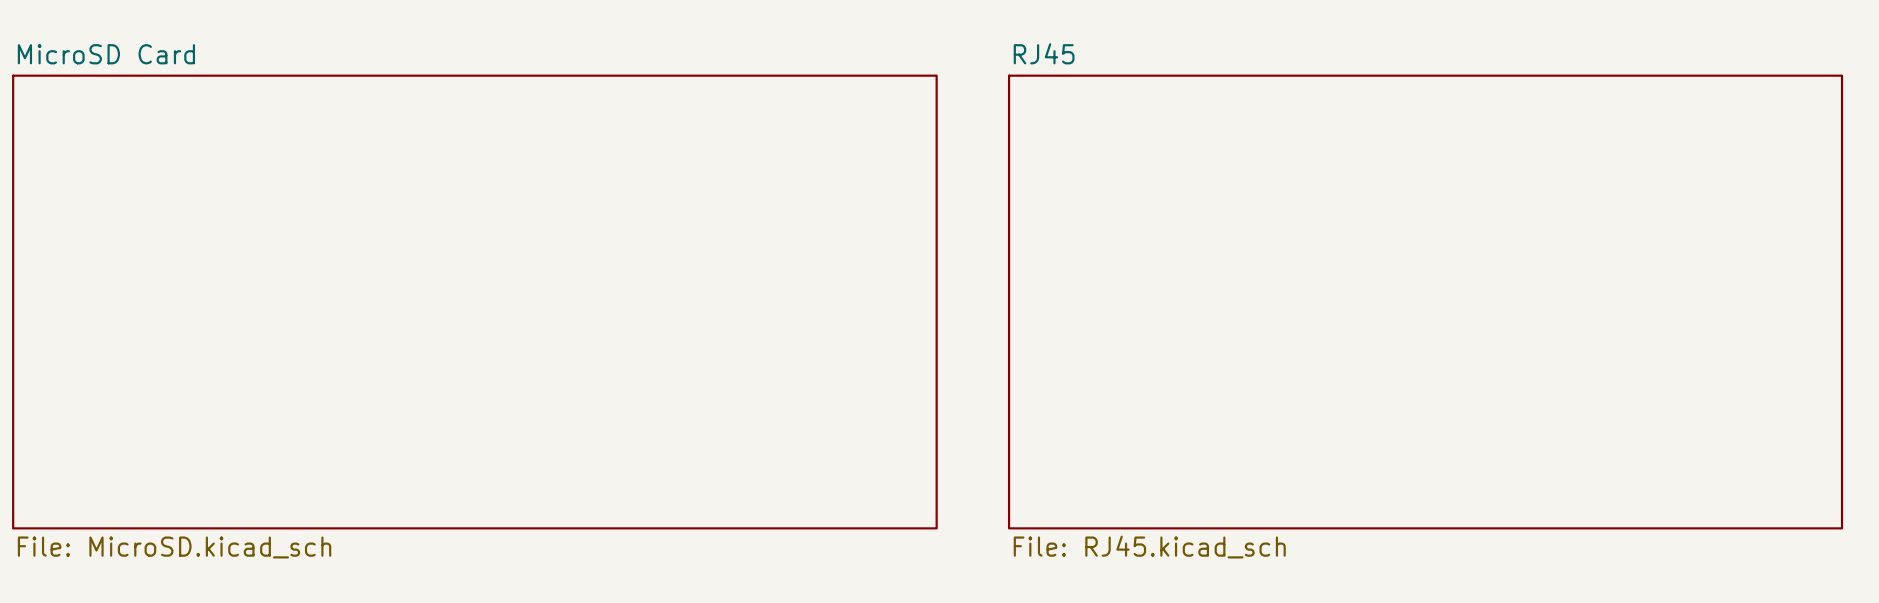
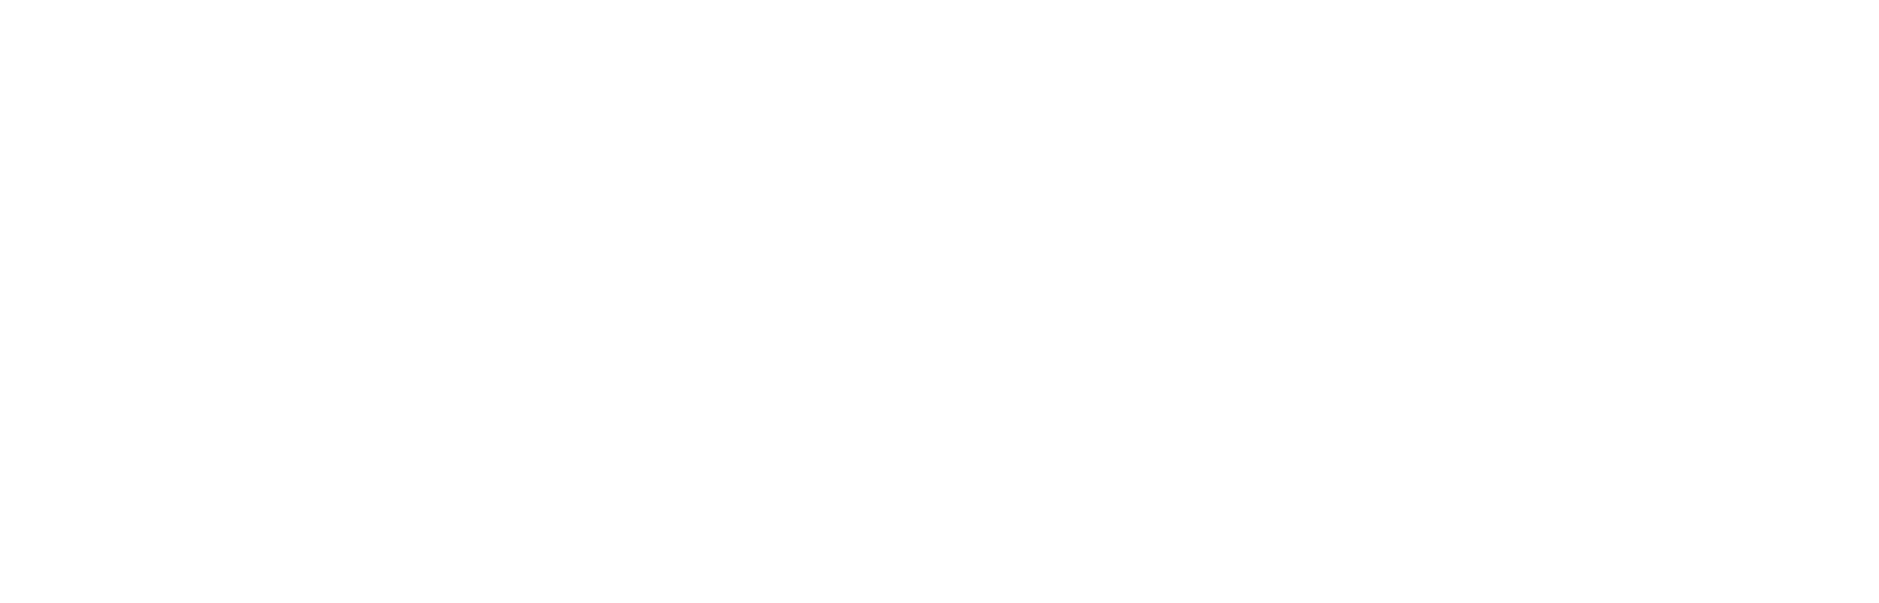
sheet MicroSD Card: File: MicroSD.kicad_sch (474, 302) -> none
sheet RJ45: File: RJ45.kicad_sch (1425, 302) -> none

